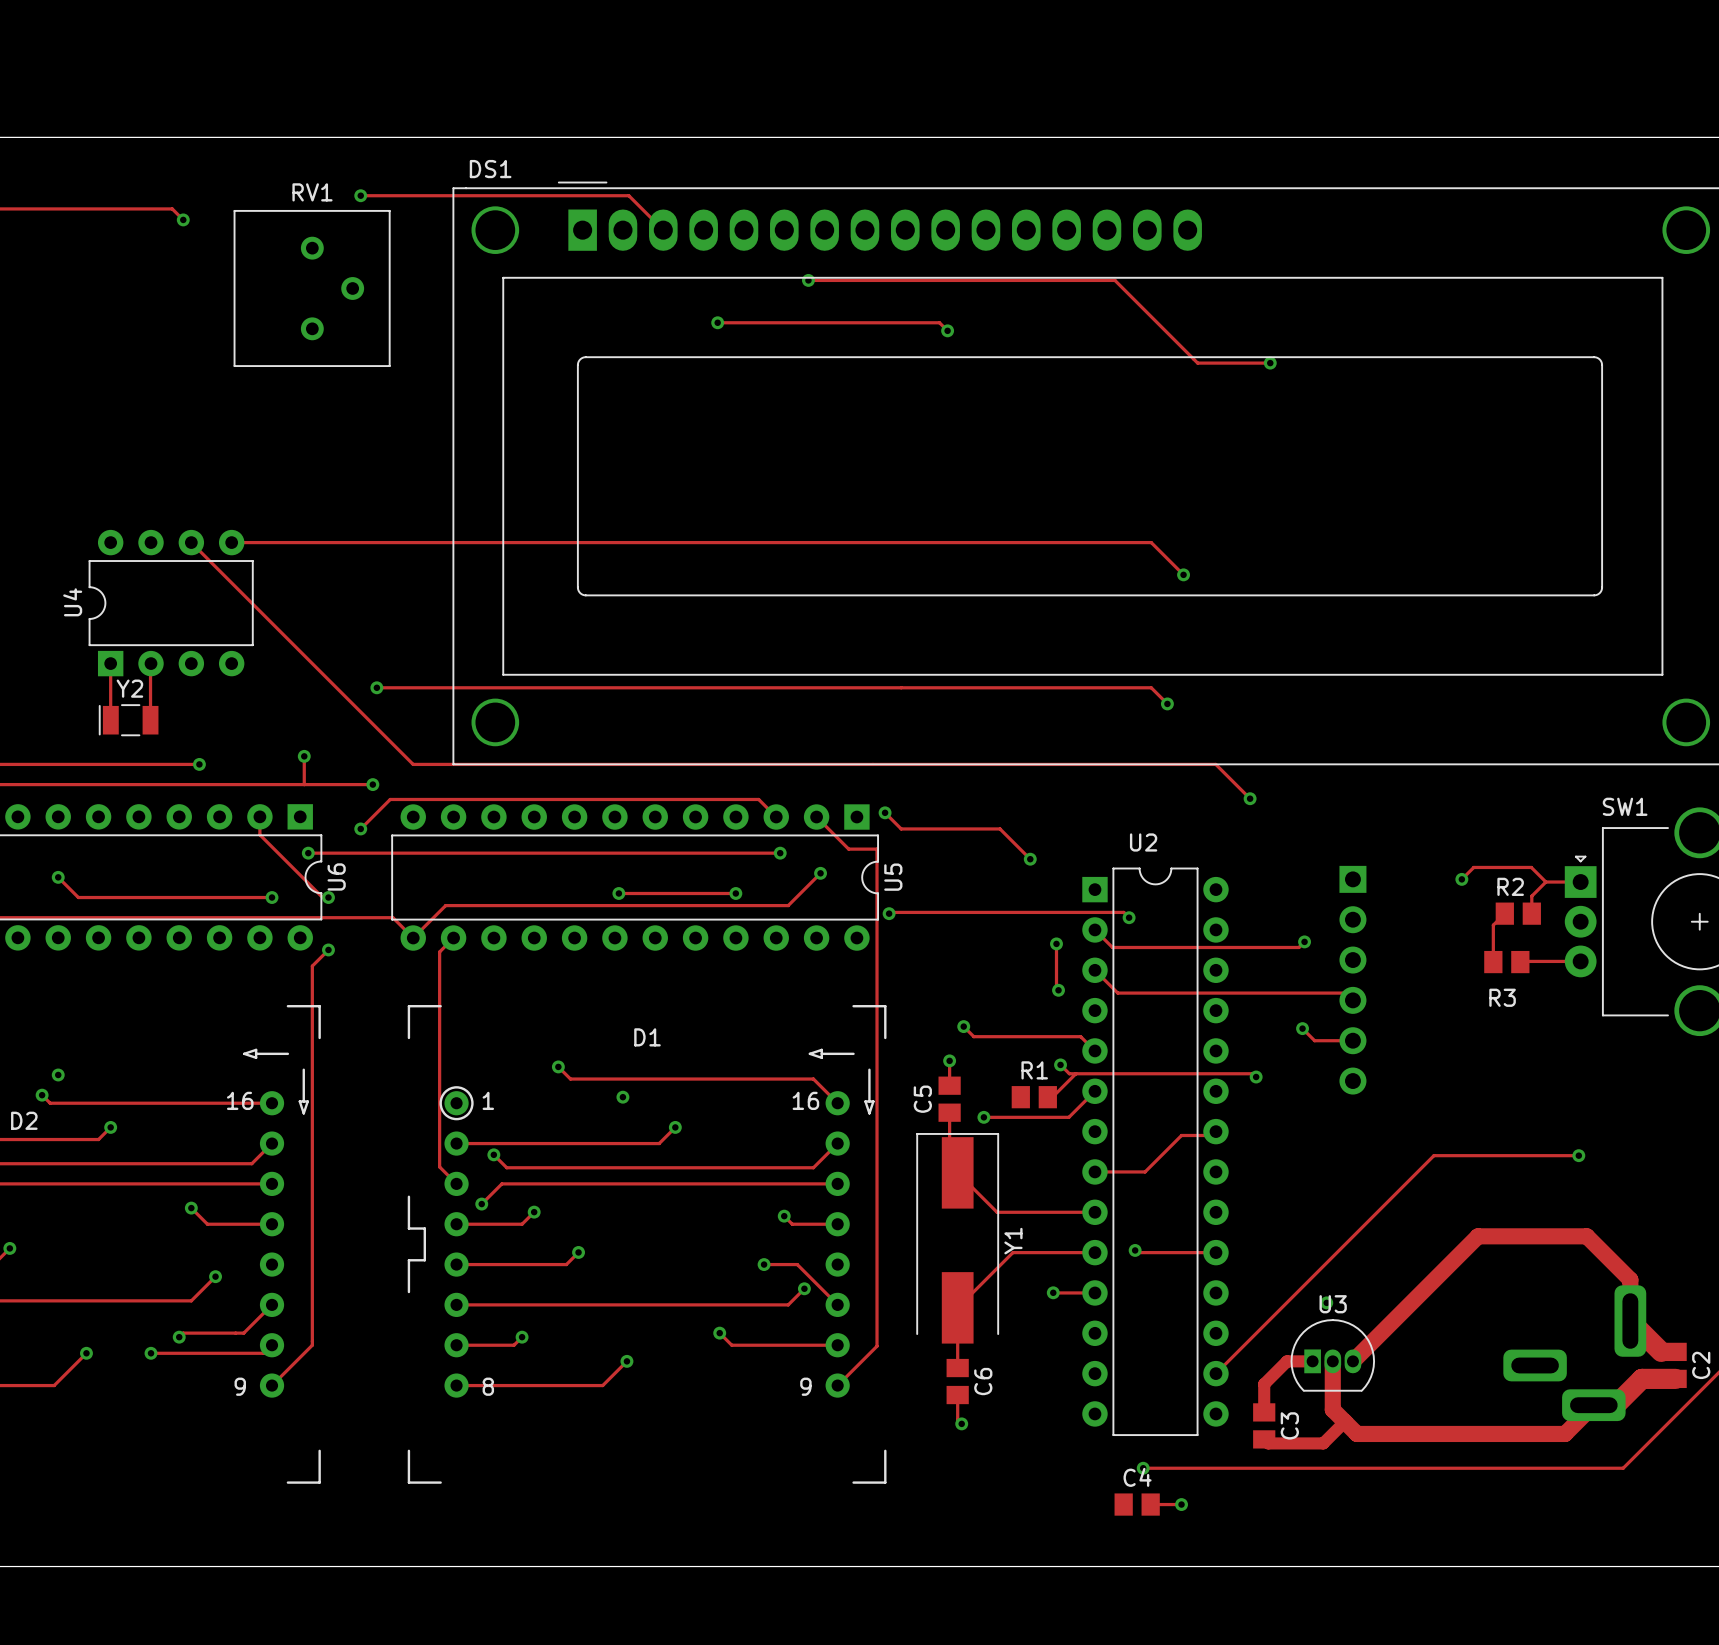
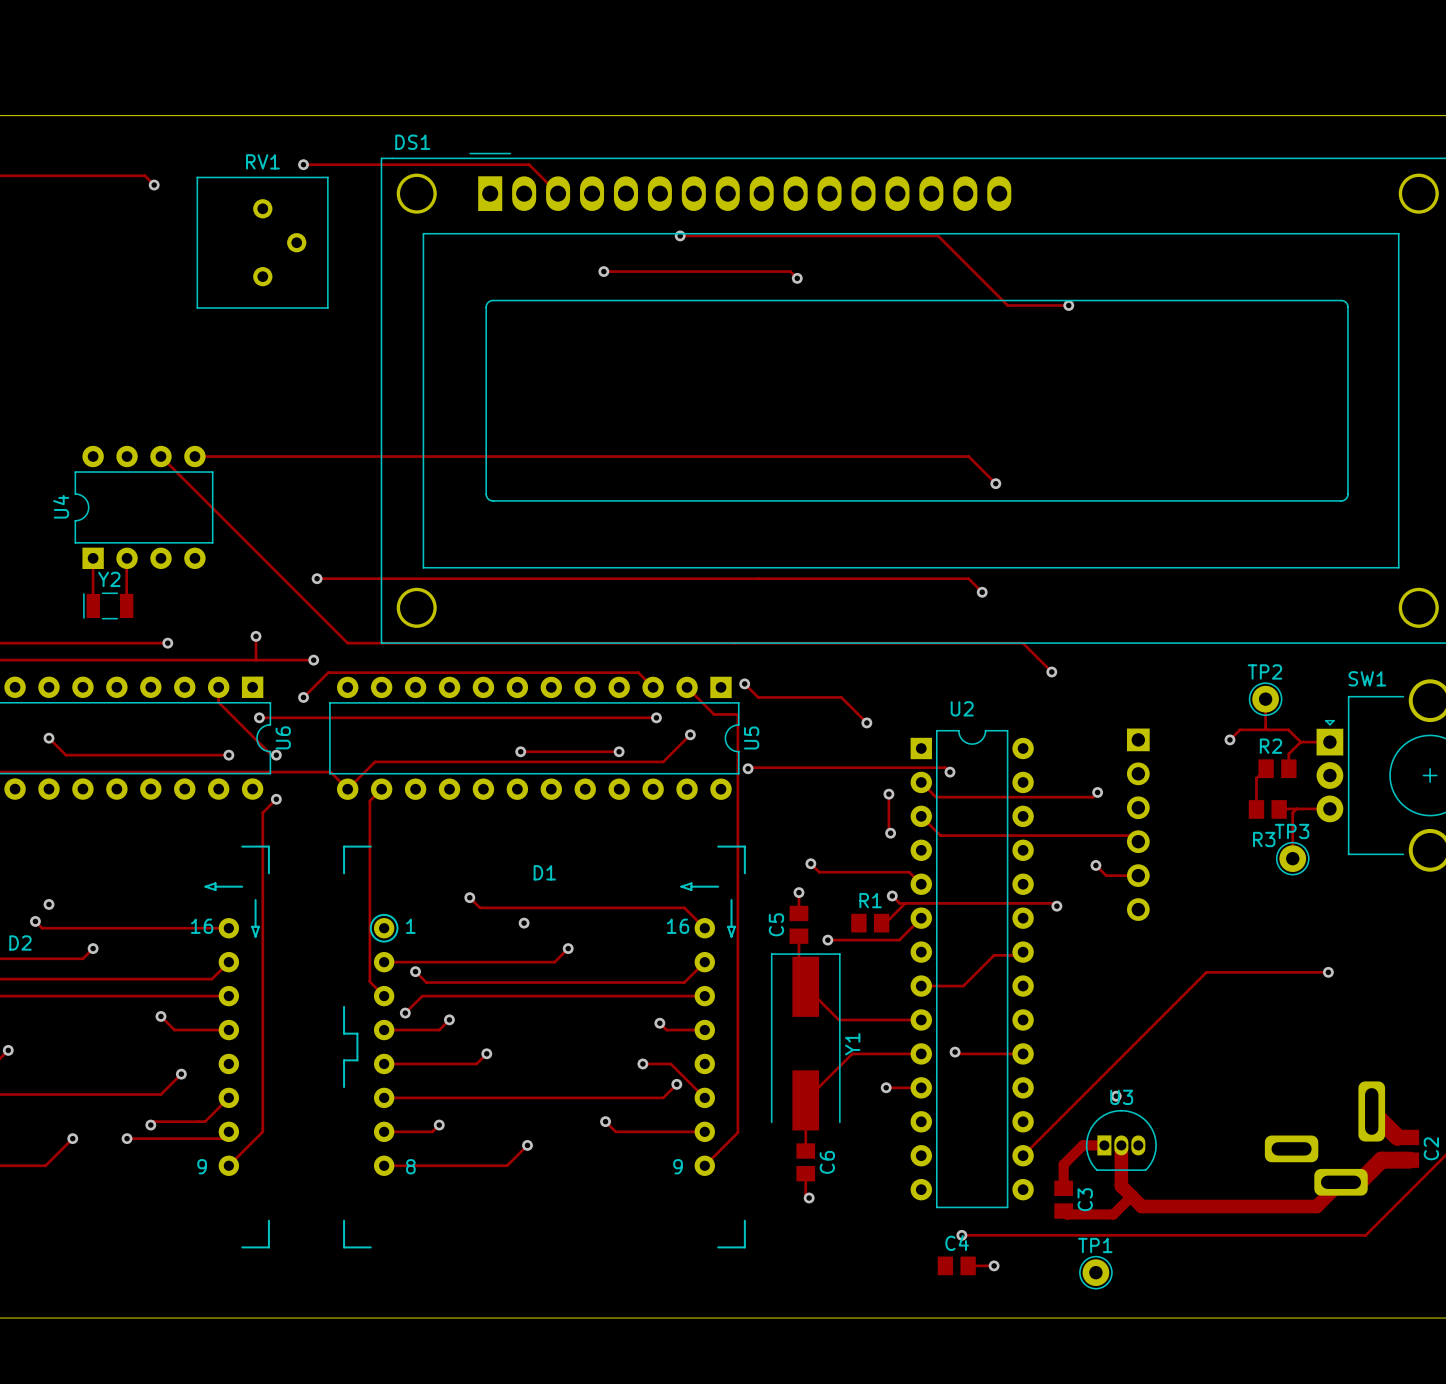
track: none -> (1265, 699) (1265, 728) (1267, 729)
TP2: none -> (1265, 699)
track: none -> (1296, 808) (1292, 812) (1292, 858)
TP3: none -> (1292, 858)
track: (1630, 1321) (1630, 1279) (1586, 1236) (1477, 1236) (1352, 1361) -> none
TP1: none -> (1095, 1272)

